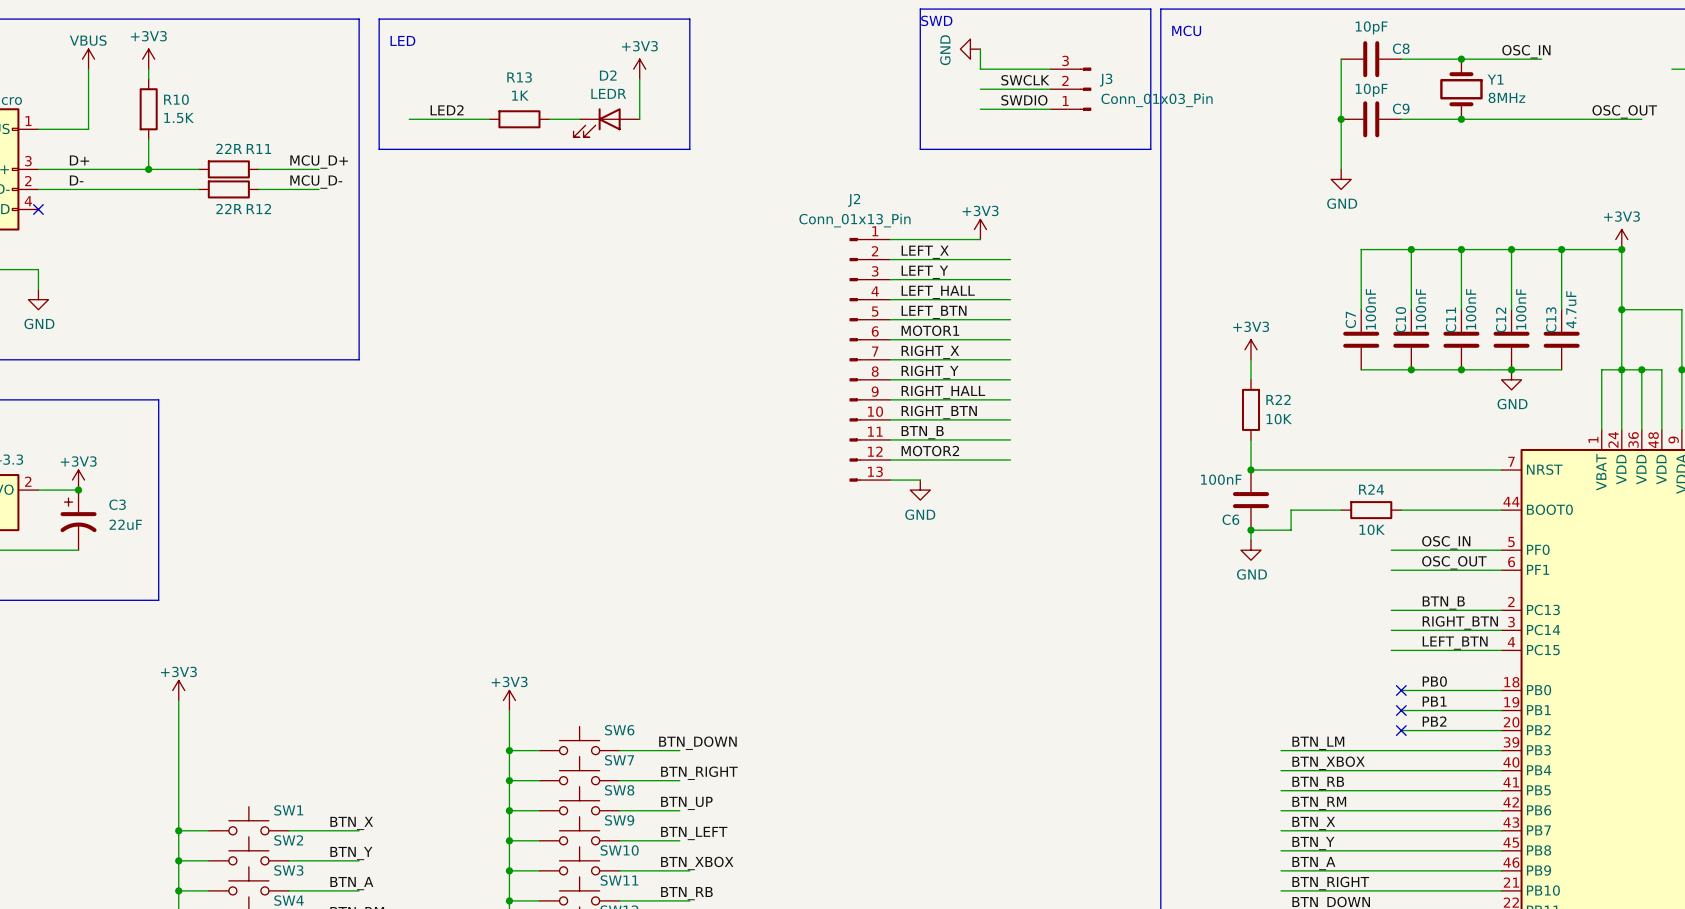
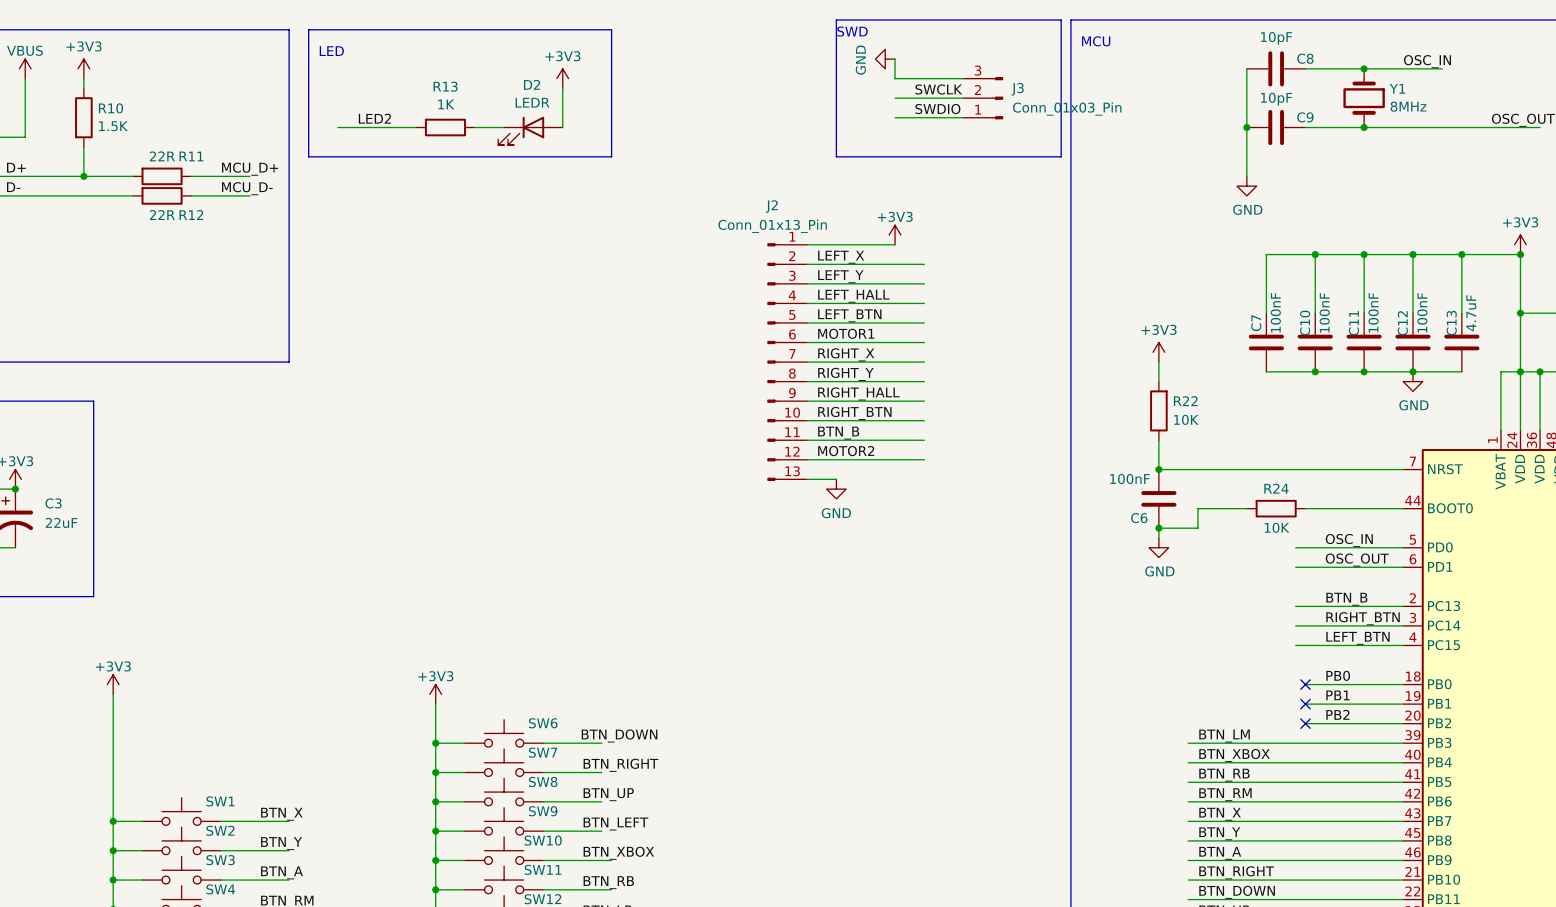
part pin name: PF0 (1538, 549) -> PD0 (1440, 547)
part pin name: PF1 (1538, 569) -> PD1 (1440, 566)

